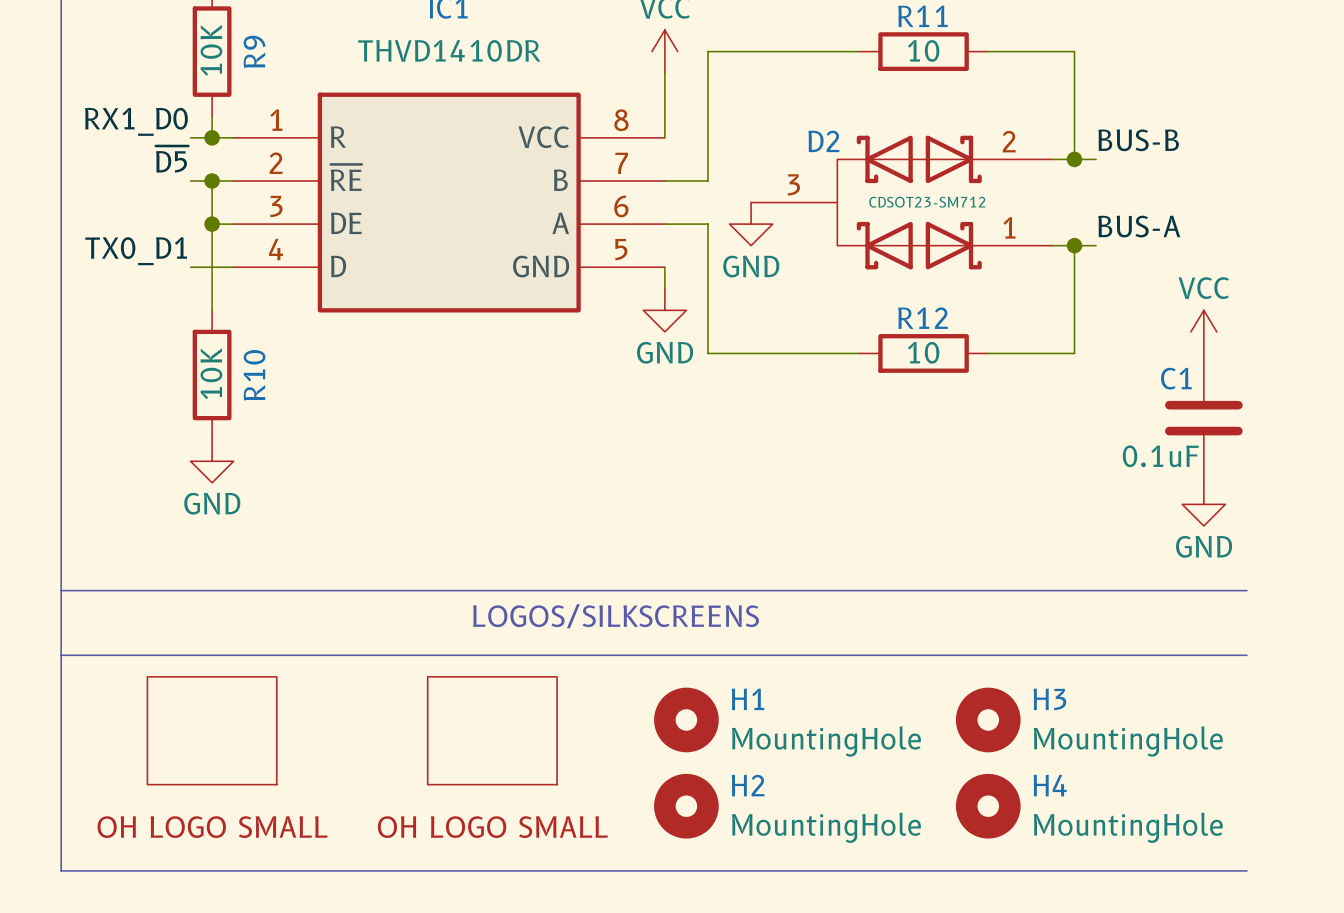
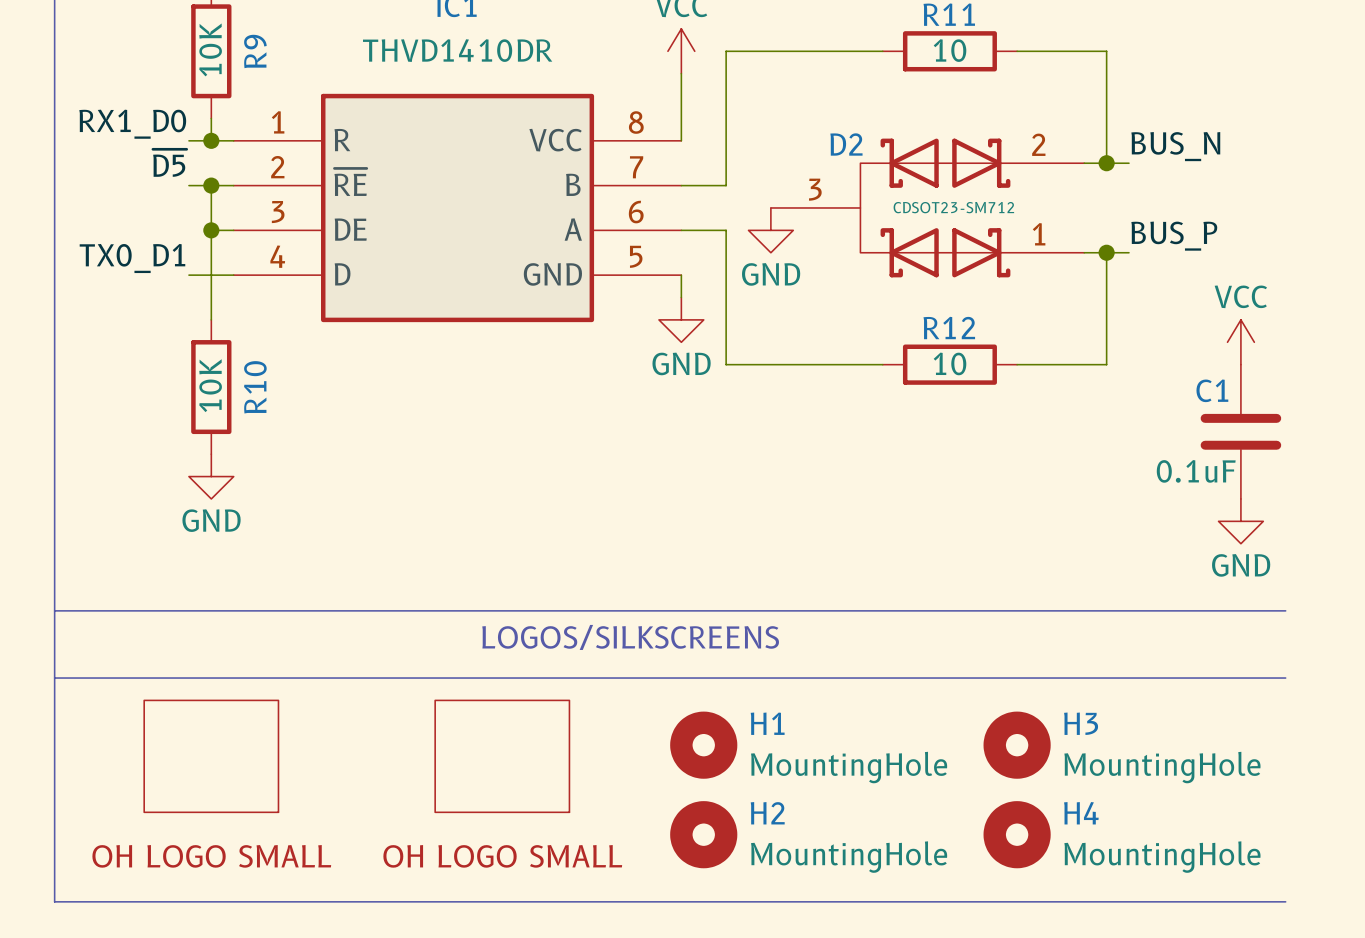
label: BUS-B (1138, 140) -> BUS_N (1175, 146)
label: BUS-A (1139, 226) -> BUS_P (1174, 236)

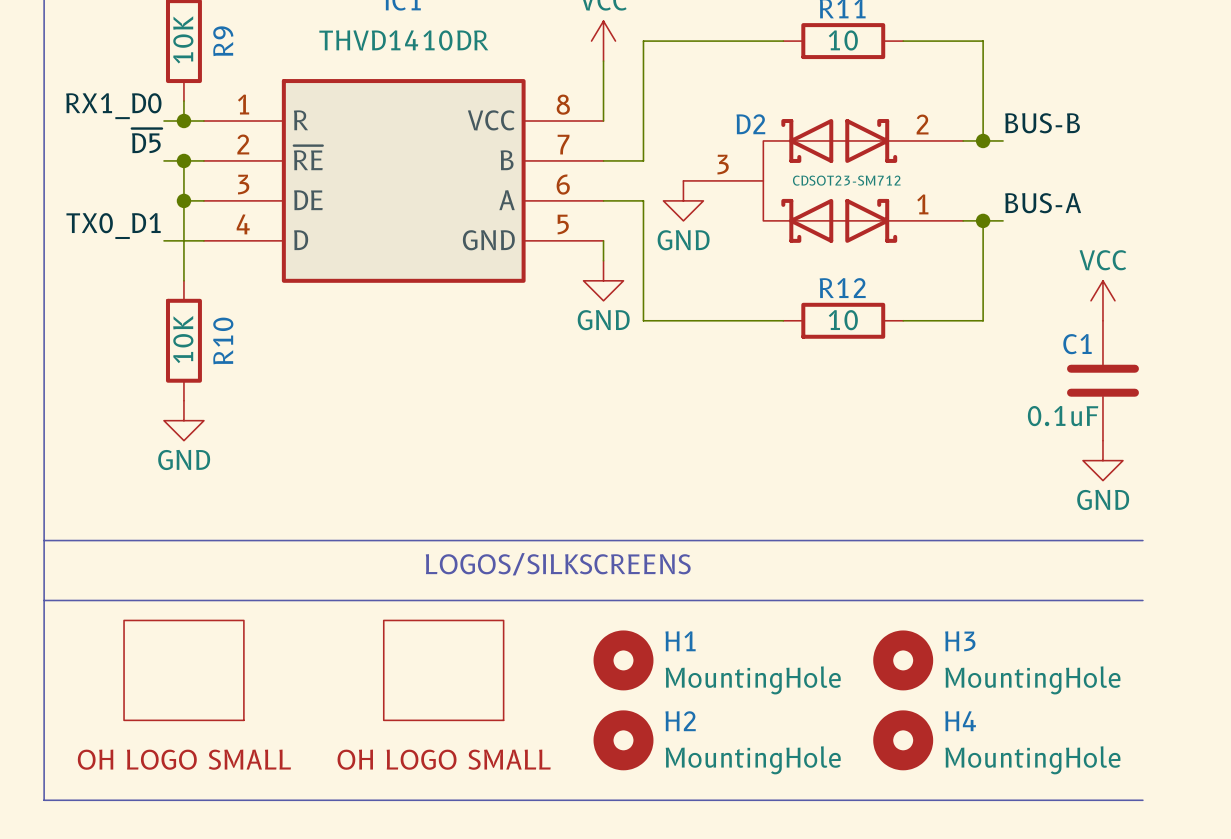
label: BUS_N (1175, 146) -> BUS-B (1042, 123)
label: BUS_P (1174, 236) -> BUS-A (1043, 203)

